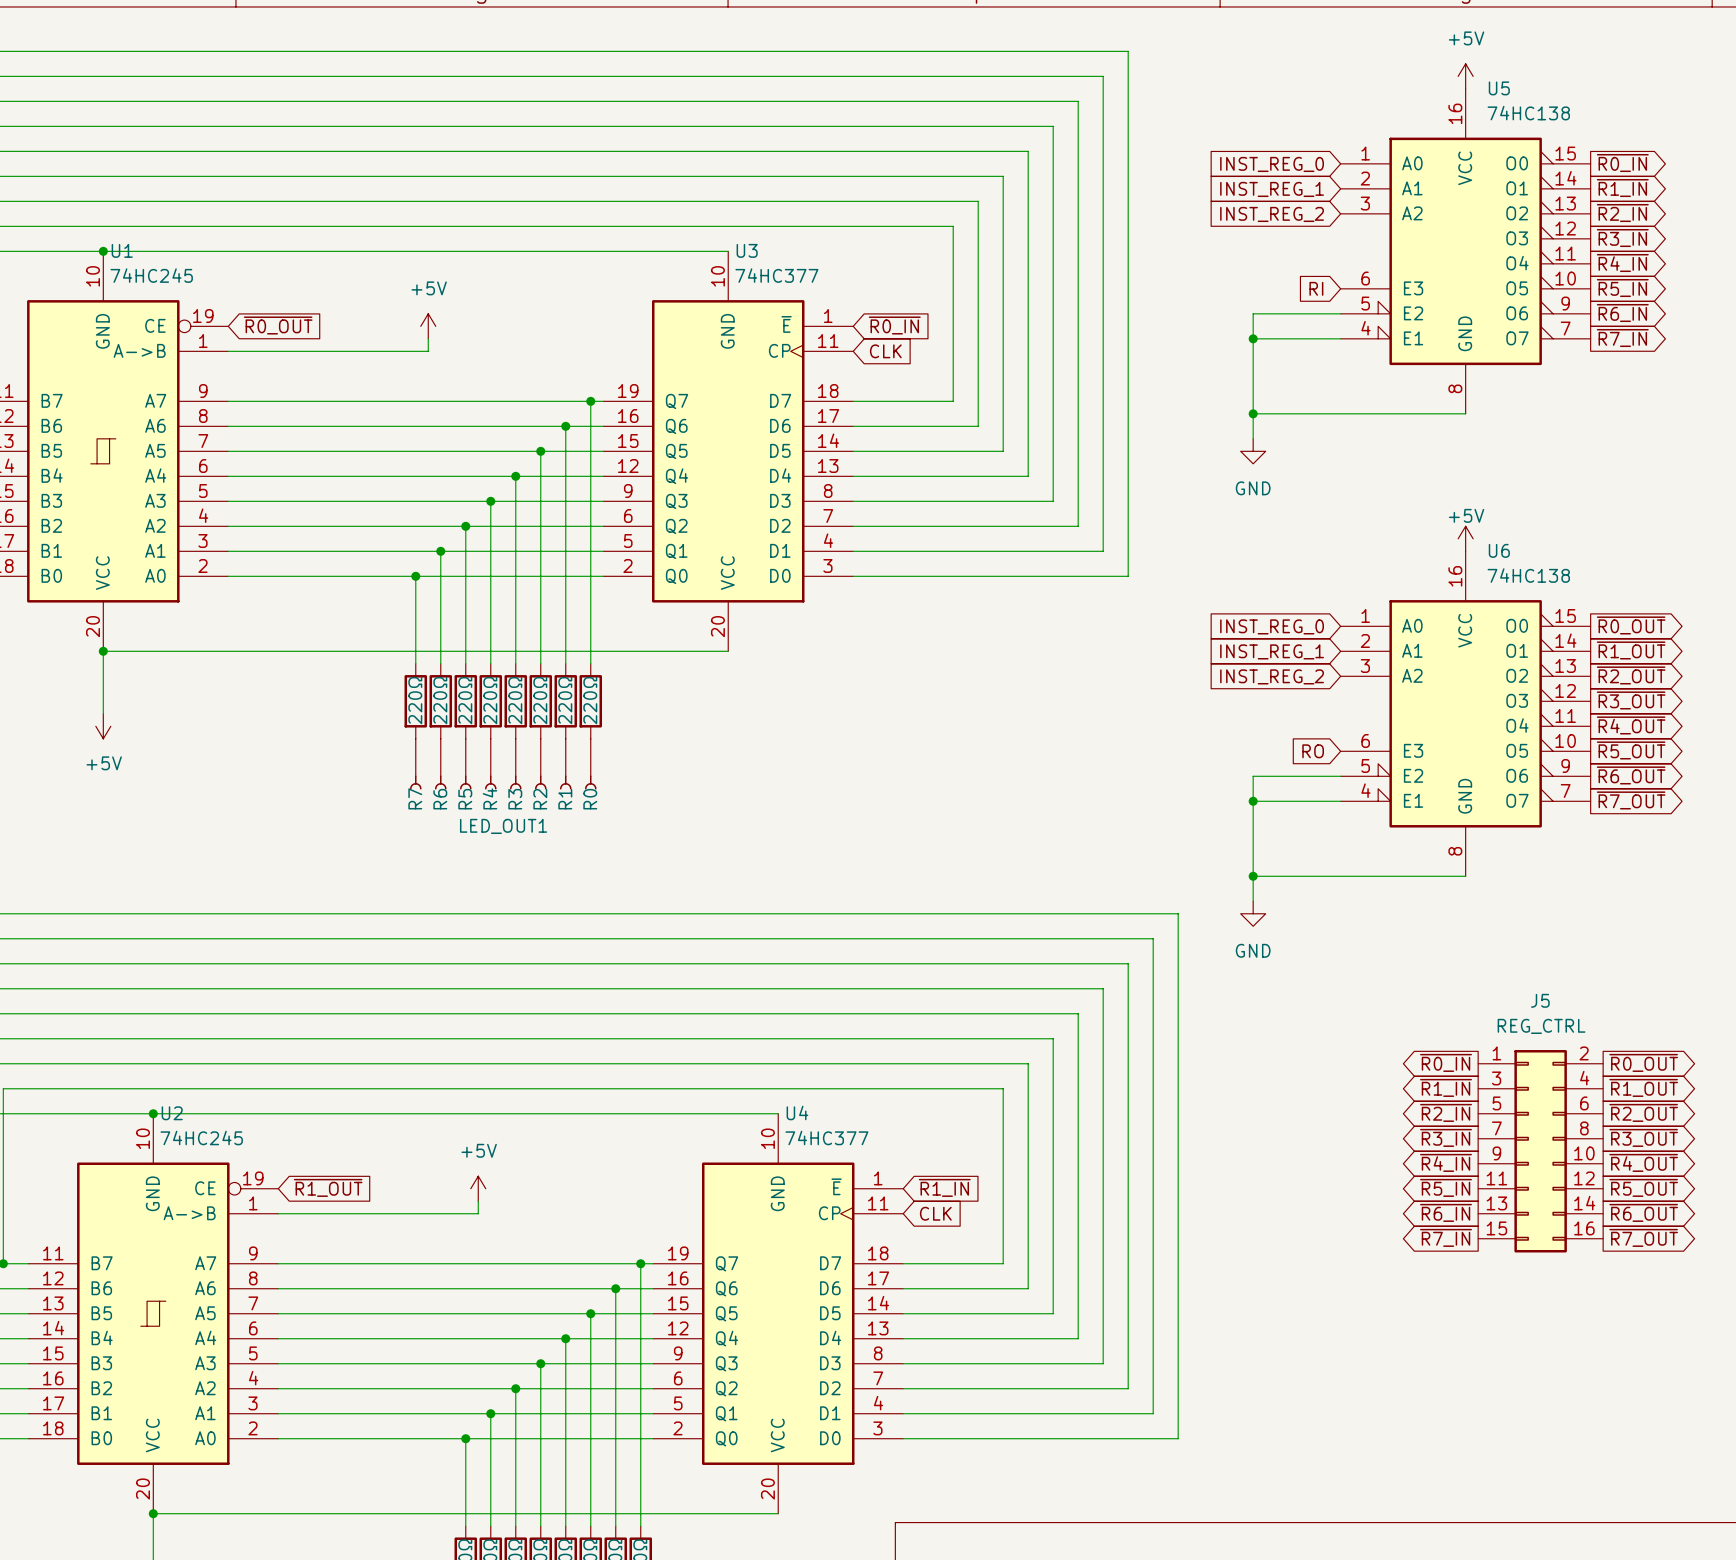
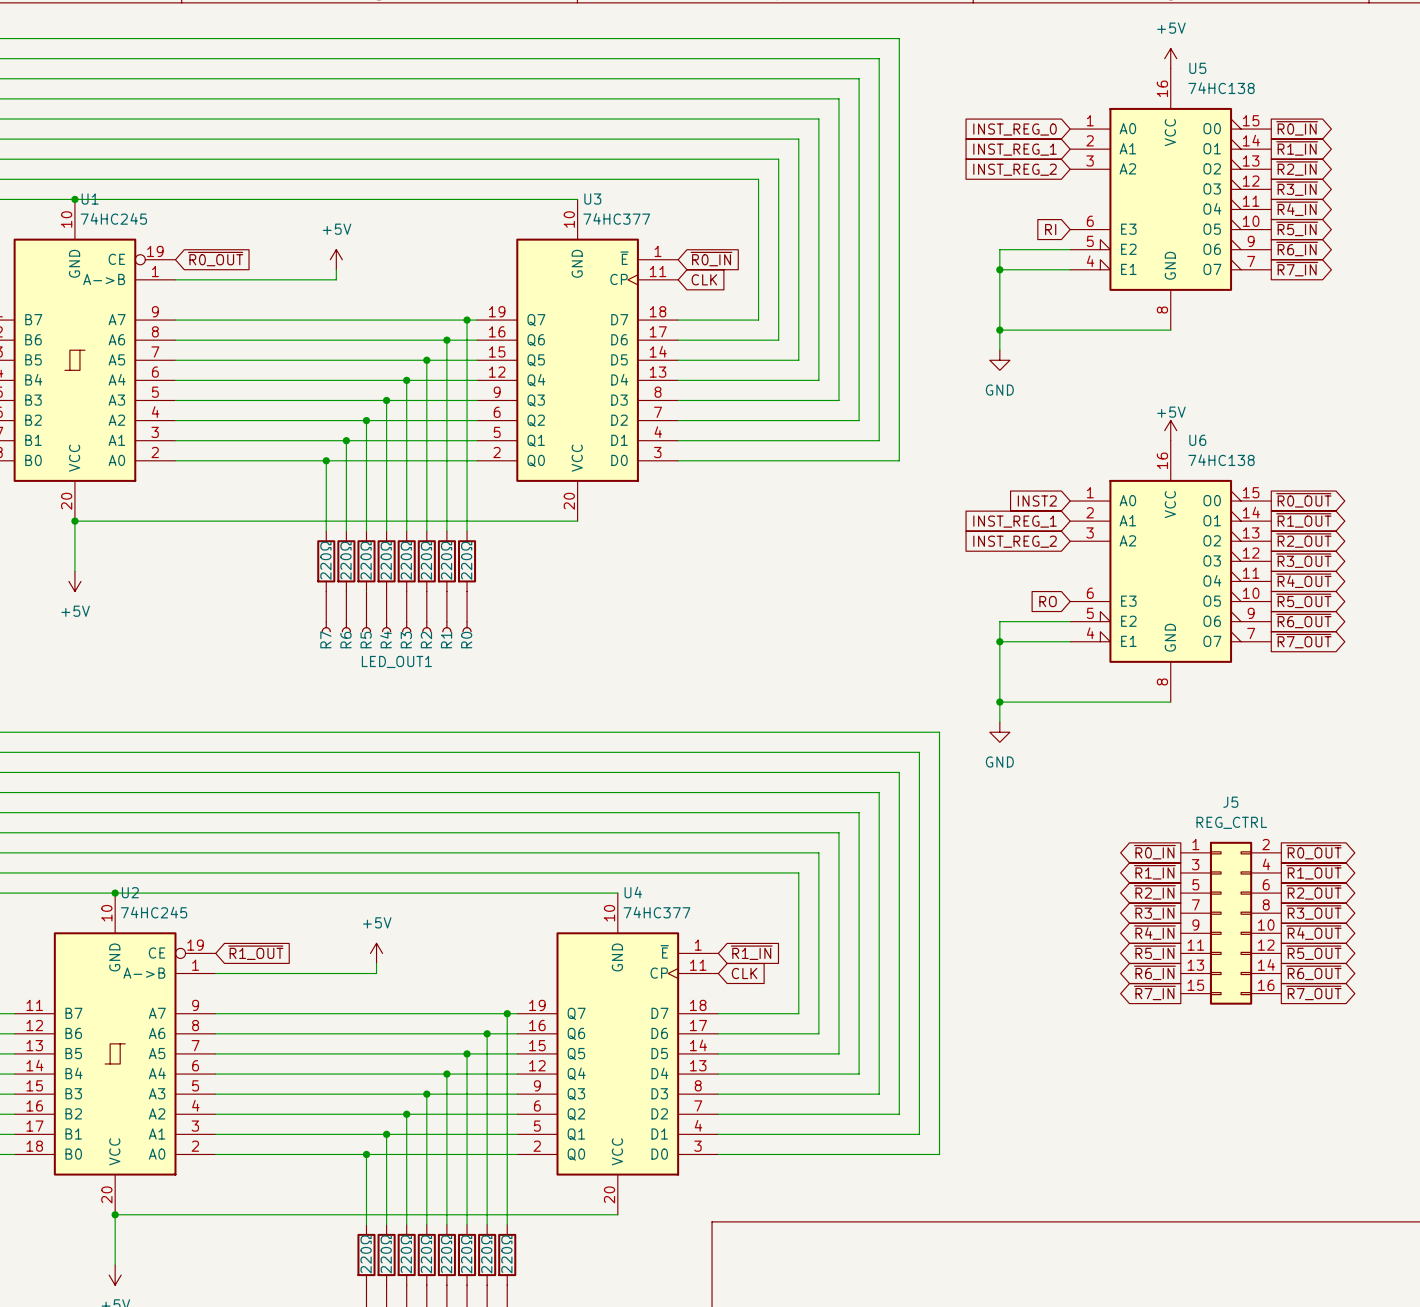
global label: INST_REG_0 (1272, 626) -> INST2 (1037, 501)

